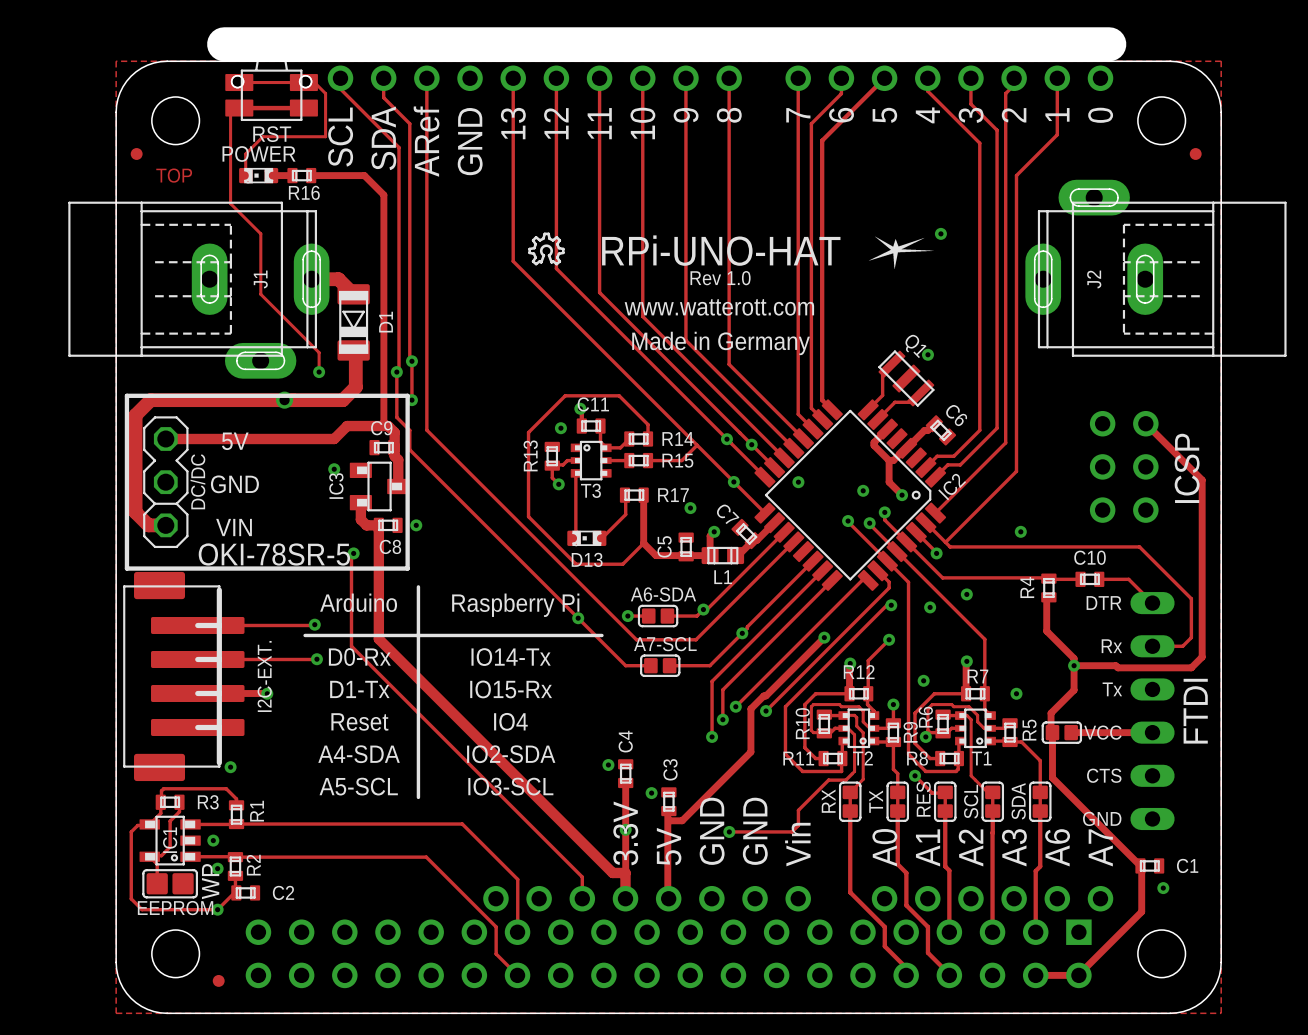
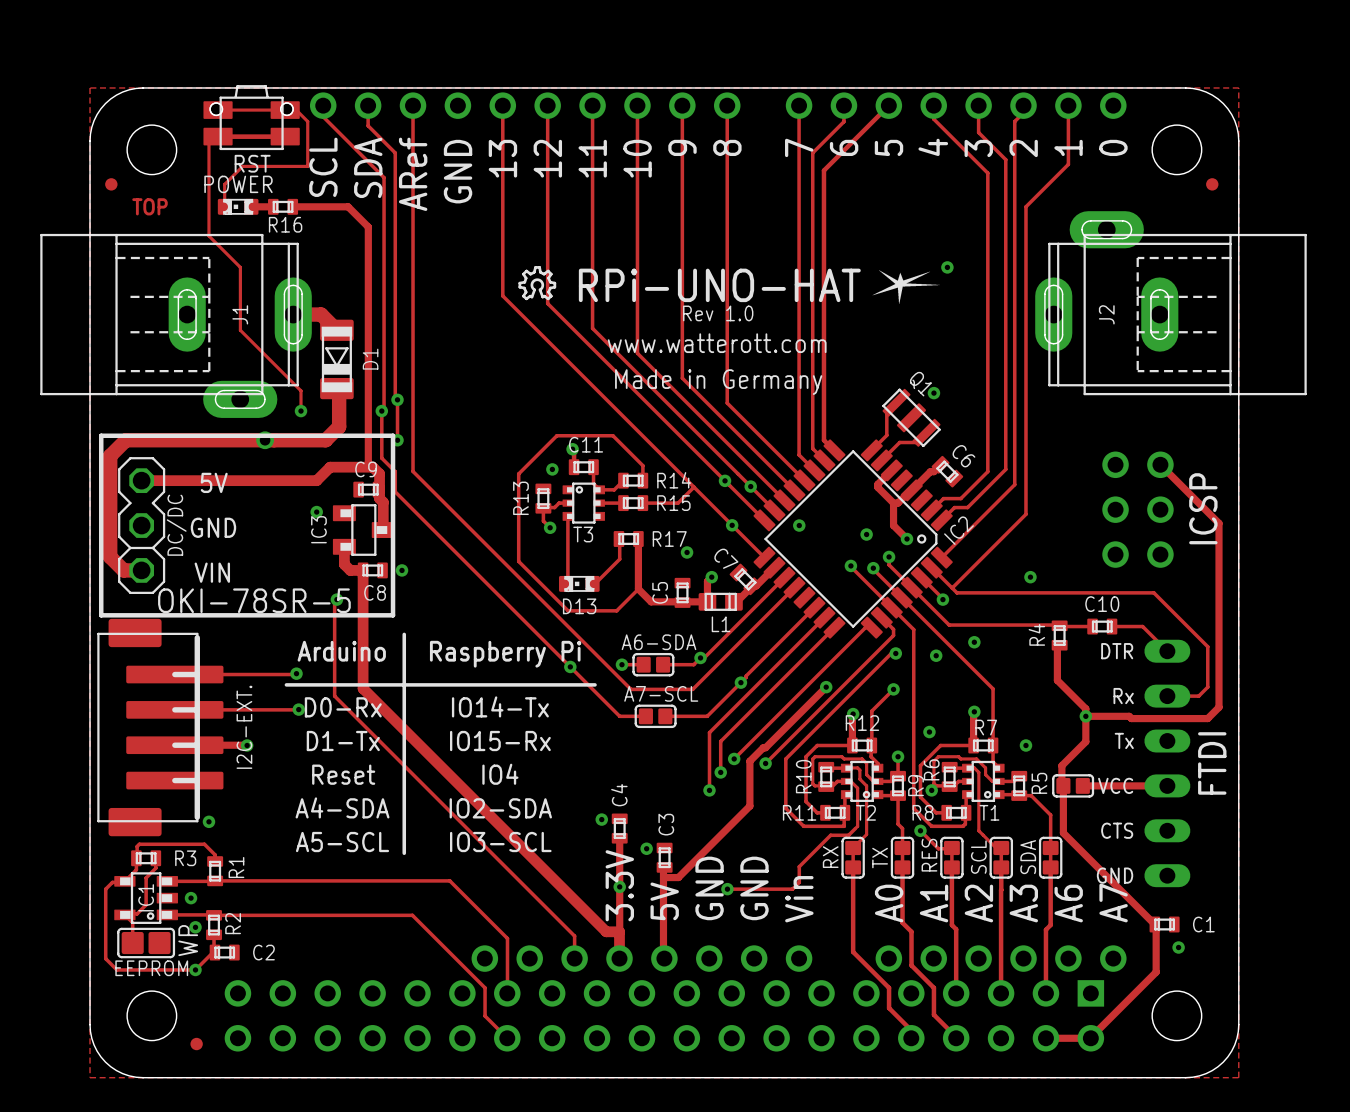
board edge: (224, 44) (1109, 44) -> none

